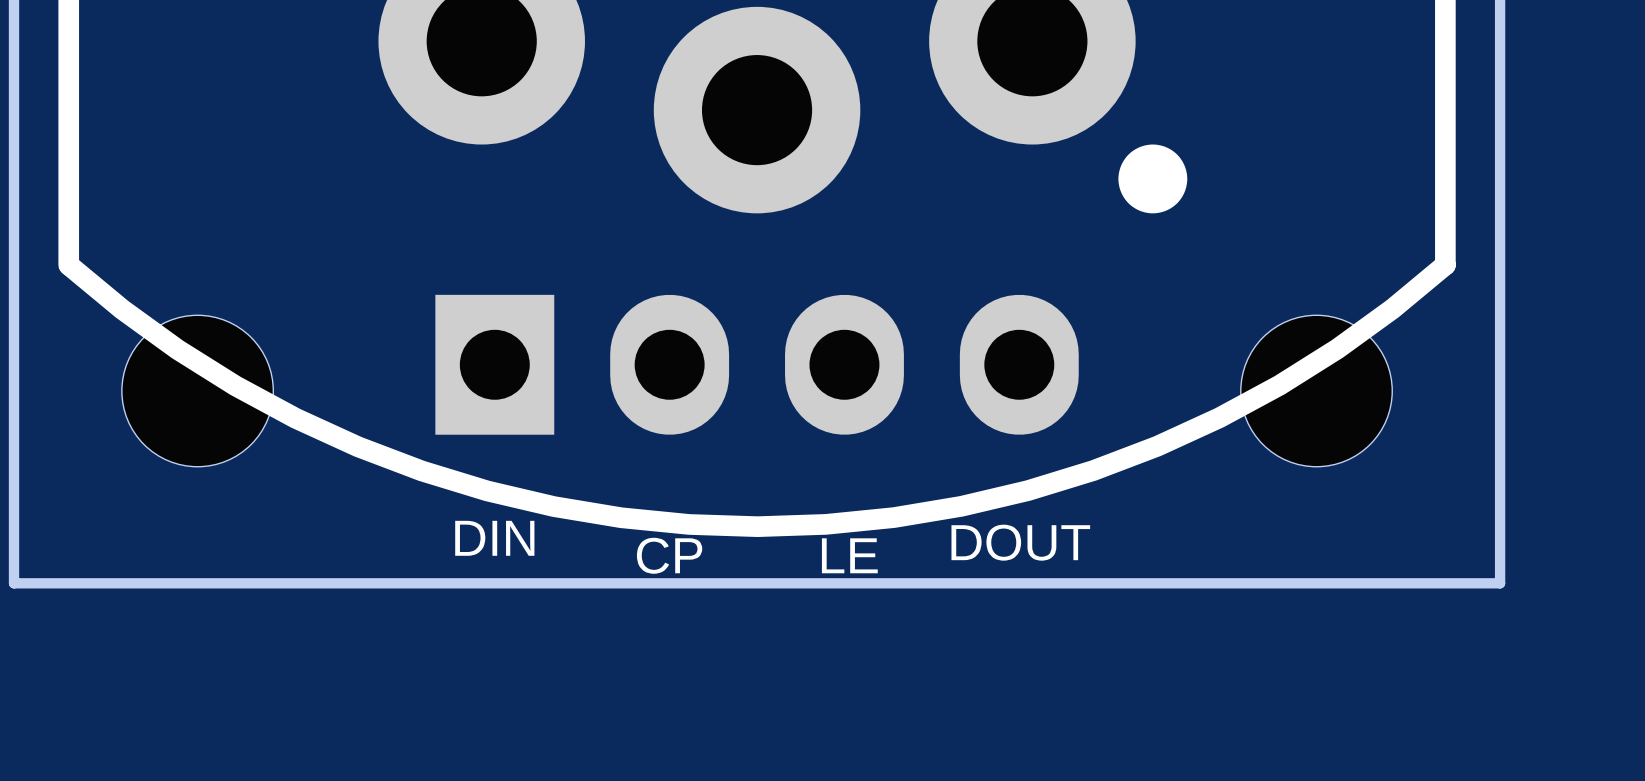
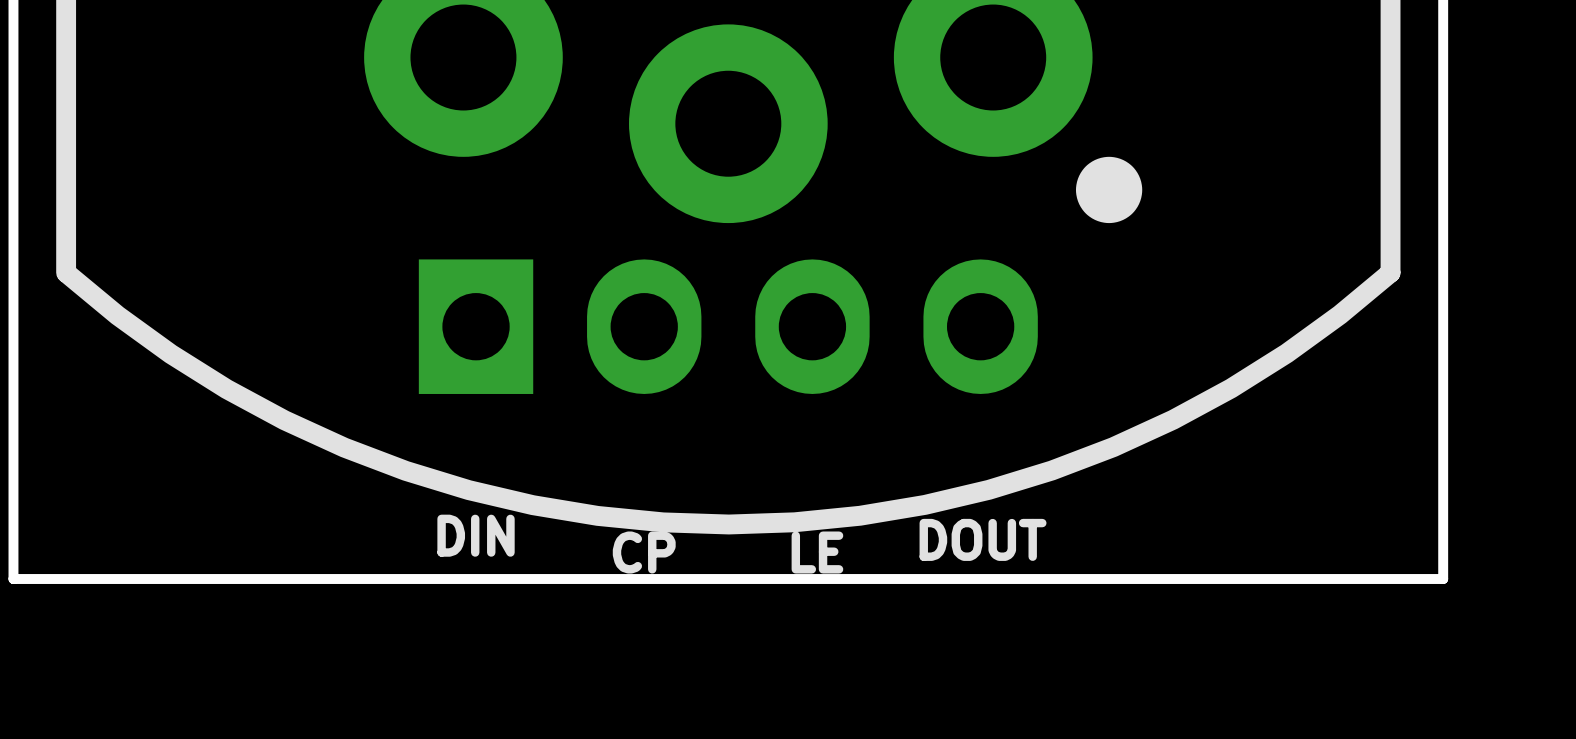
part position: (757, 364) -> (728, 326)
part: (197, 391) -> none
part: (1316, 391) -> none

